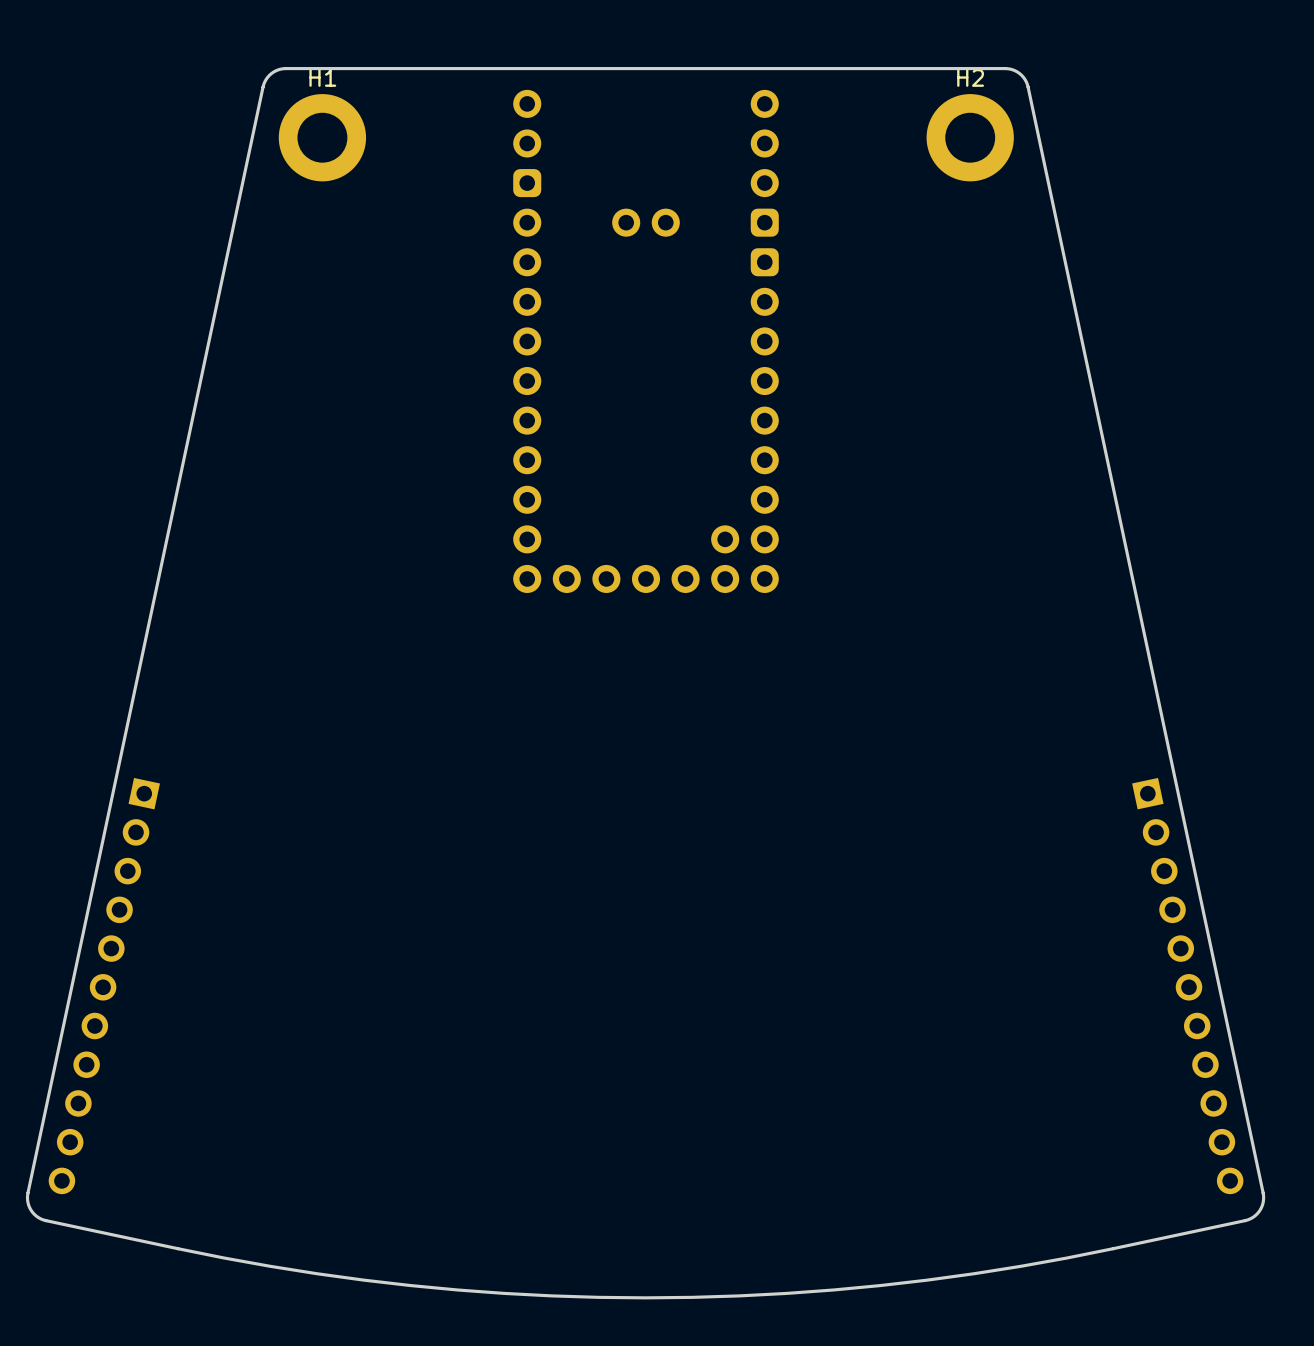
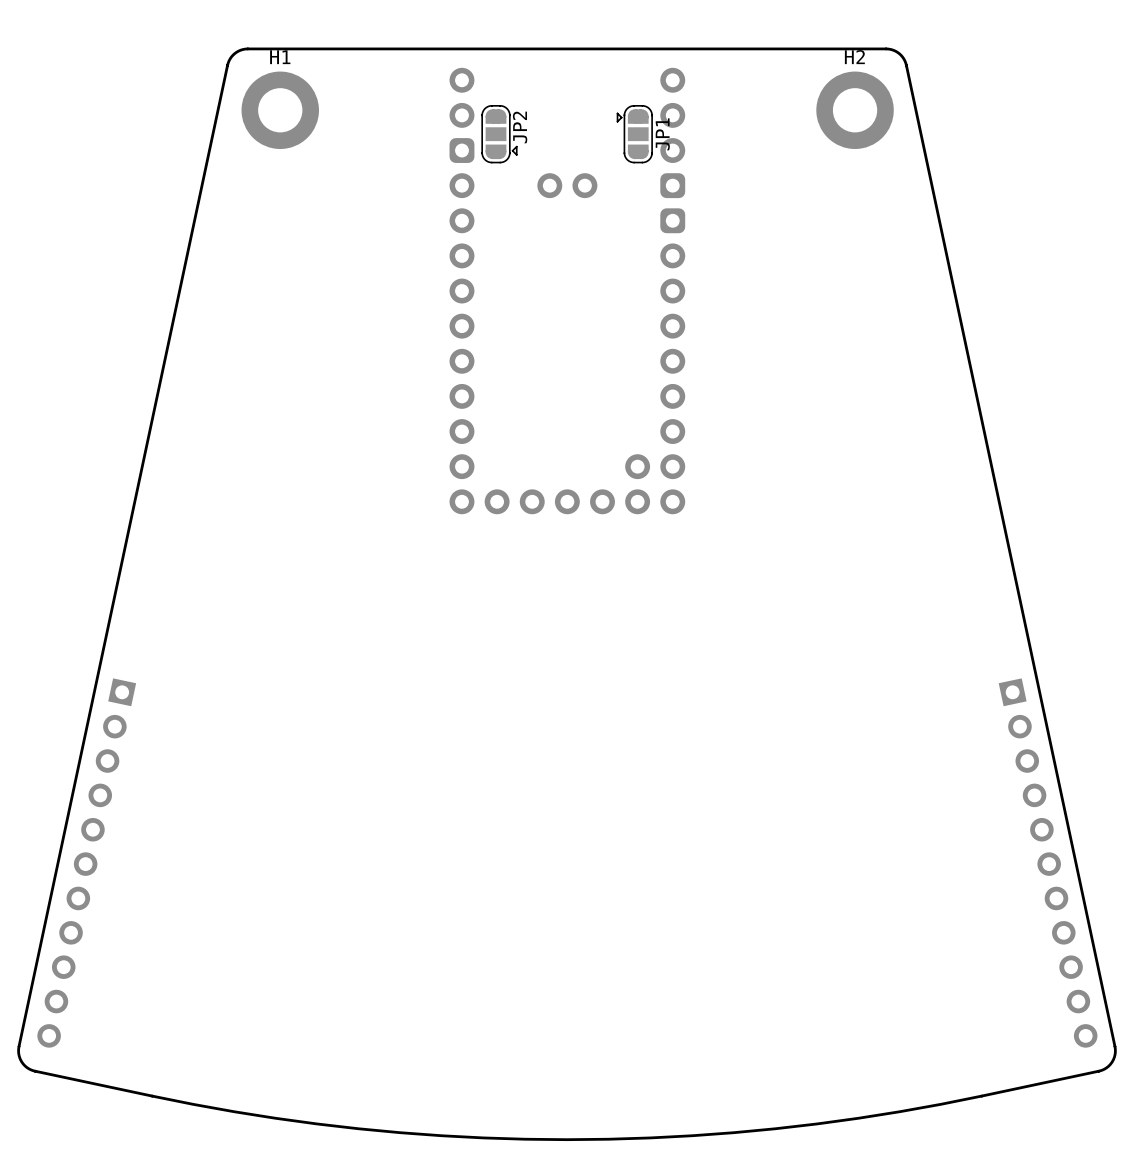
JP2: none -> (499, 134)
JP1: none -> (634, 134)

